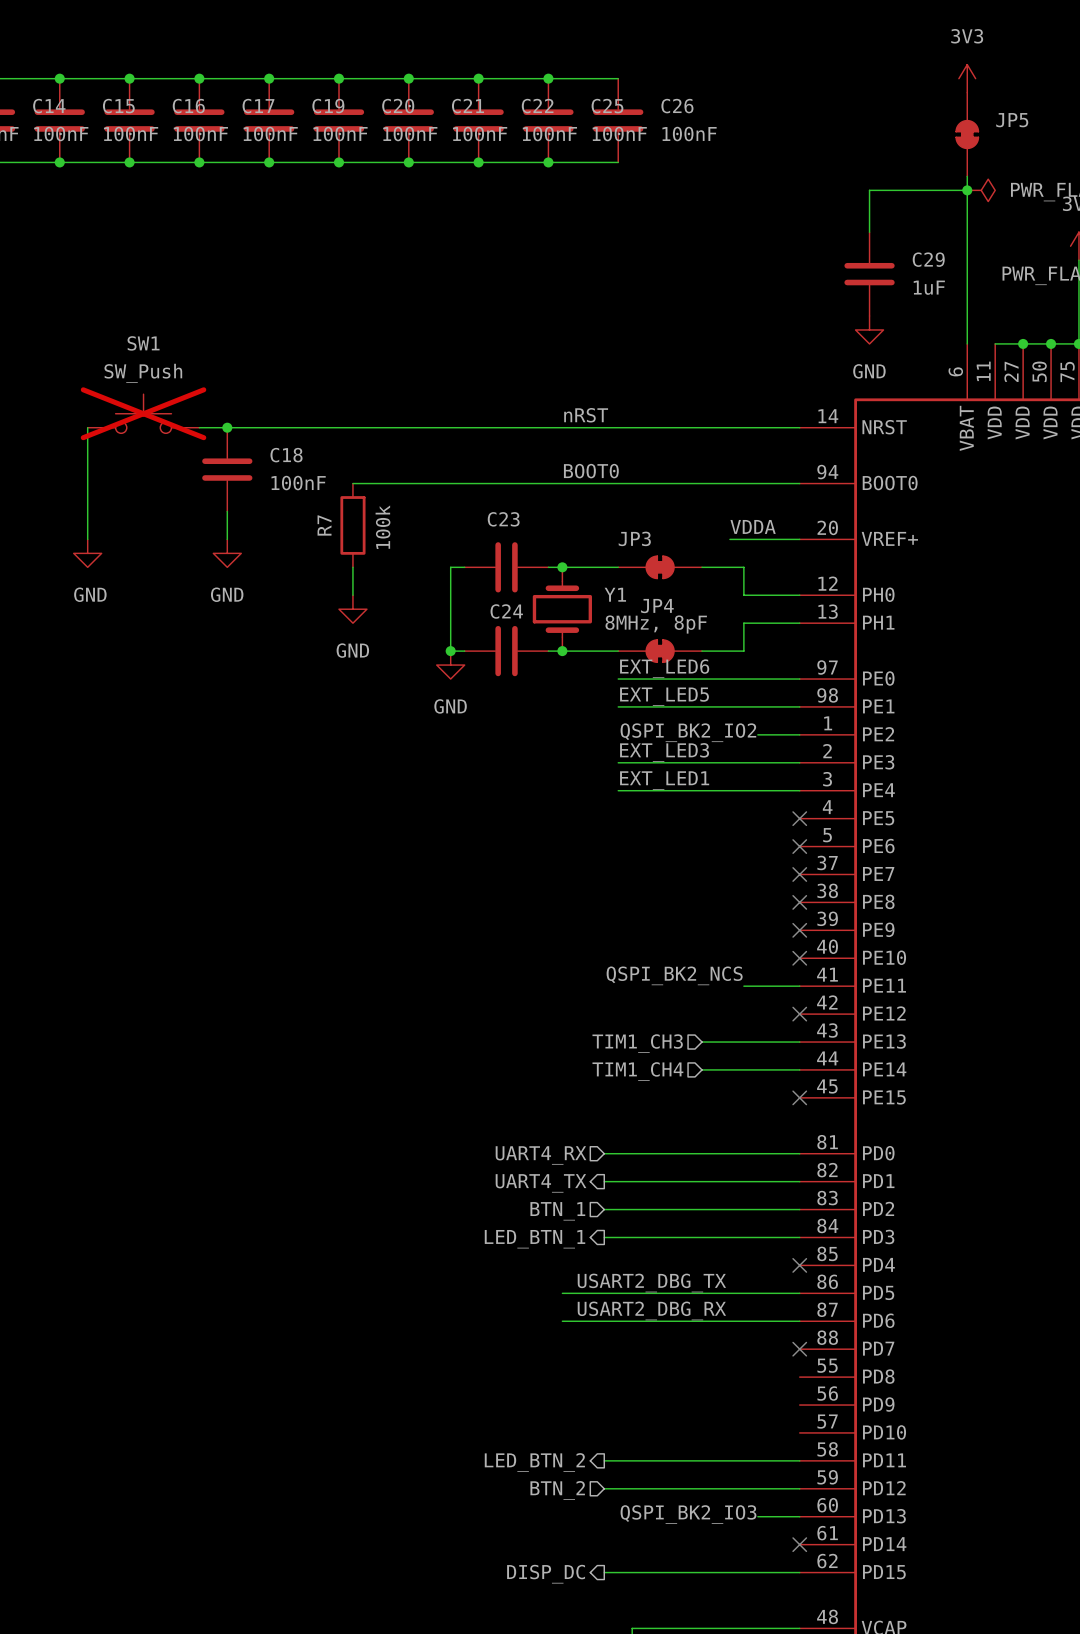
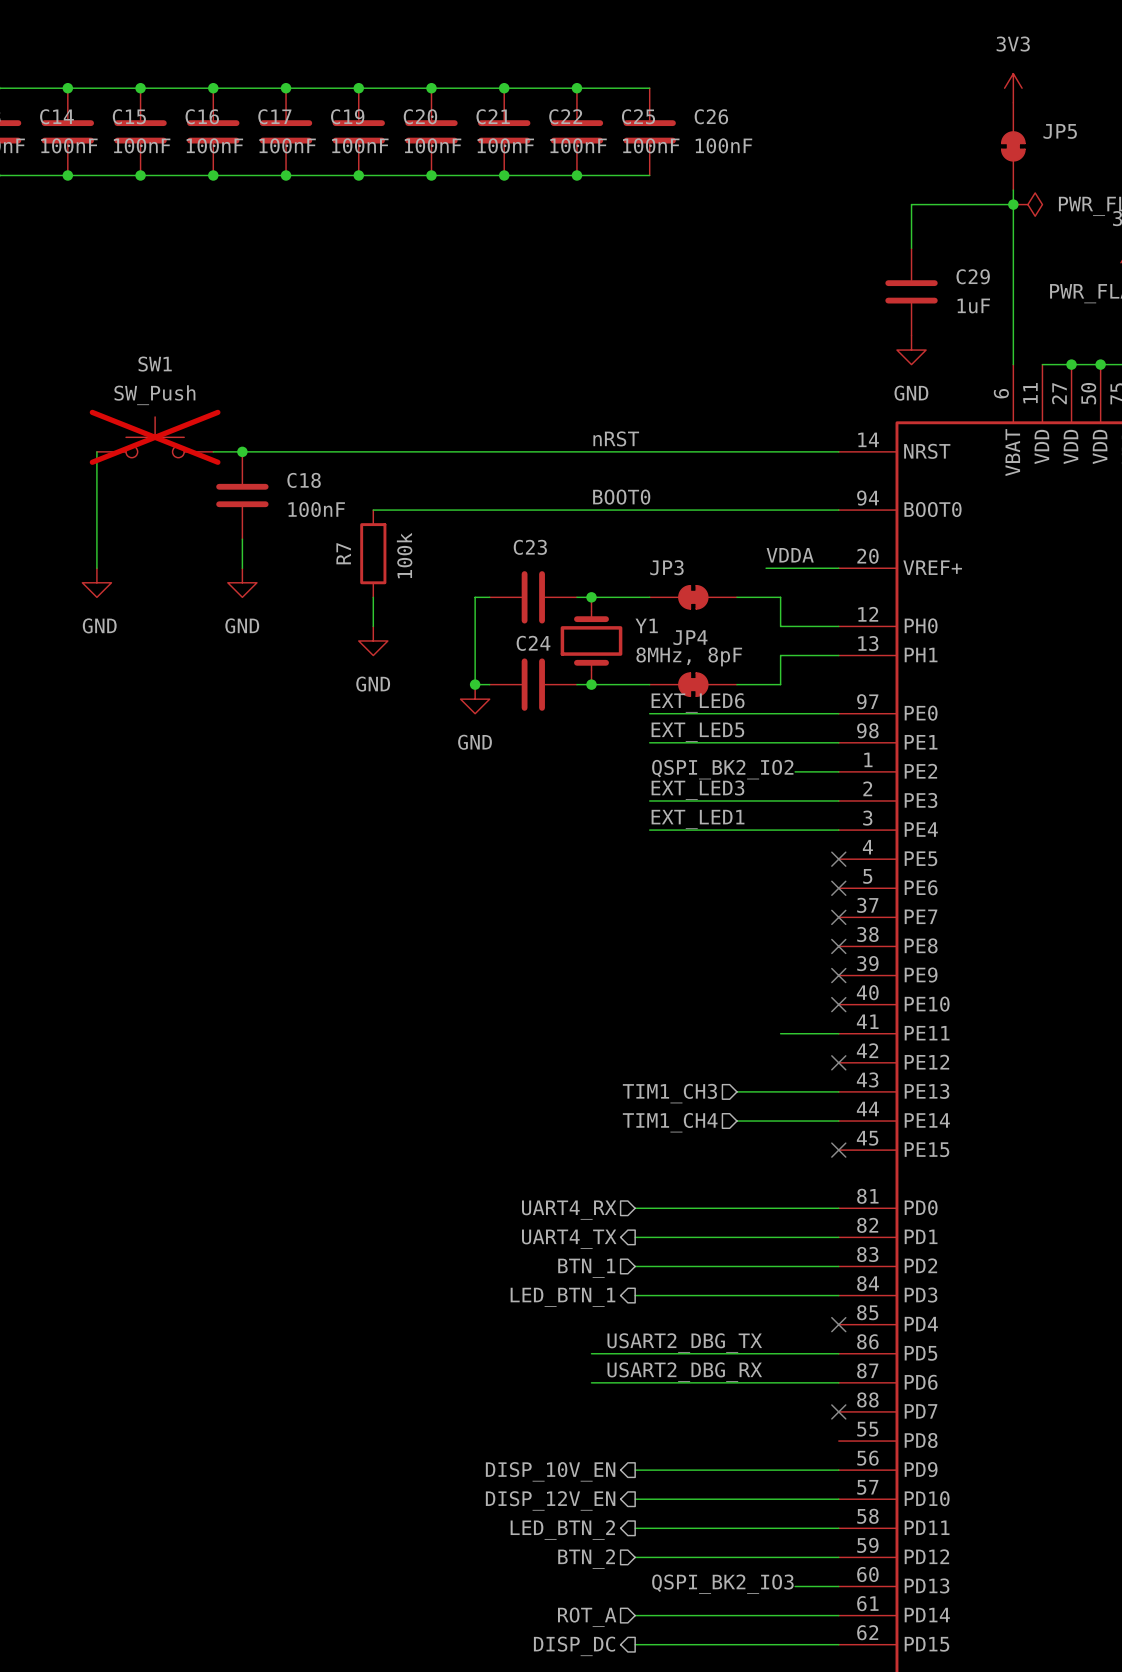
label: QSPI_BK2_NCS (674, 975) -> none
wire: none -> (635, 1470) (838, 1470)
hierarchical label: none -> DISP_10V_EN (550, 1471)
wire: none -> (635, 1499) (838, 1499)
hierarchical label: none -> DISP_12V_EN (550, 1500)
wire: none -> (635, 1615) (838, 1615)
no-connect mark: (799, 1544) -> none
hierarchical label: none -> ROT_A (587, 1617)

